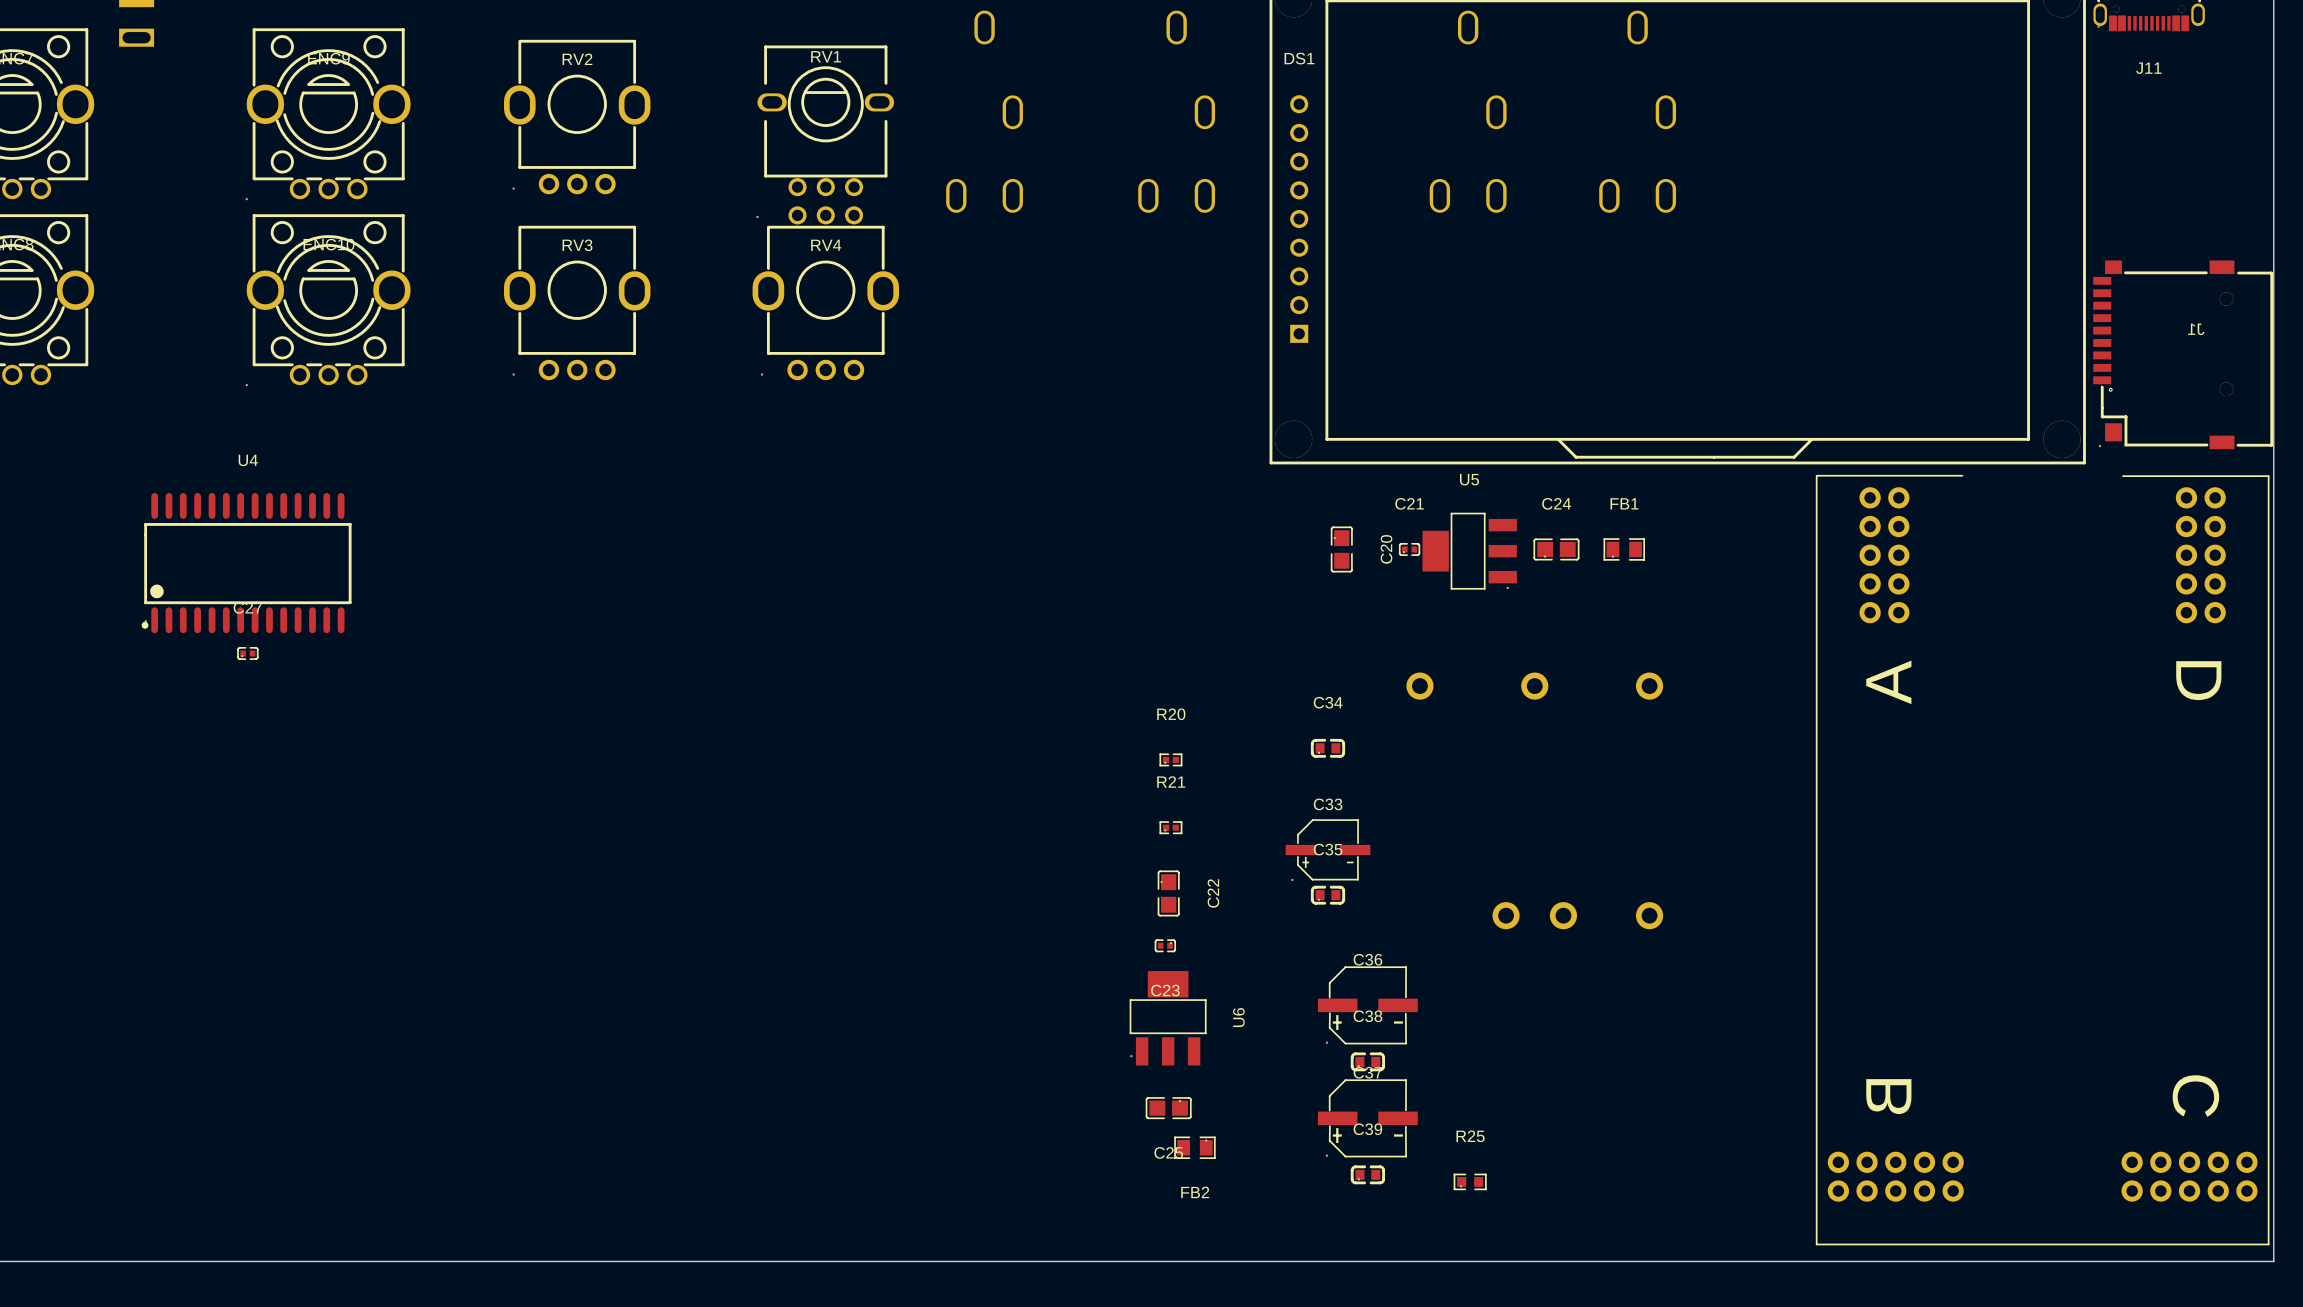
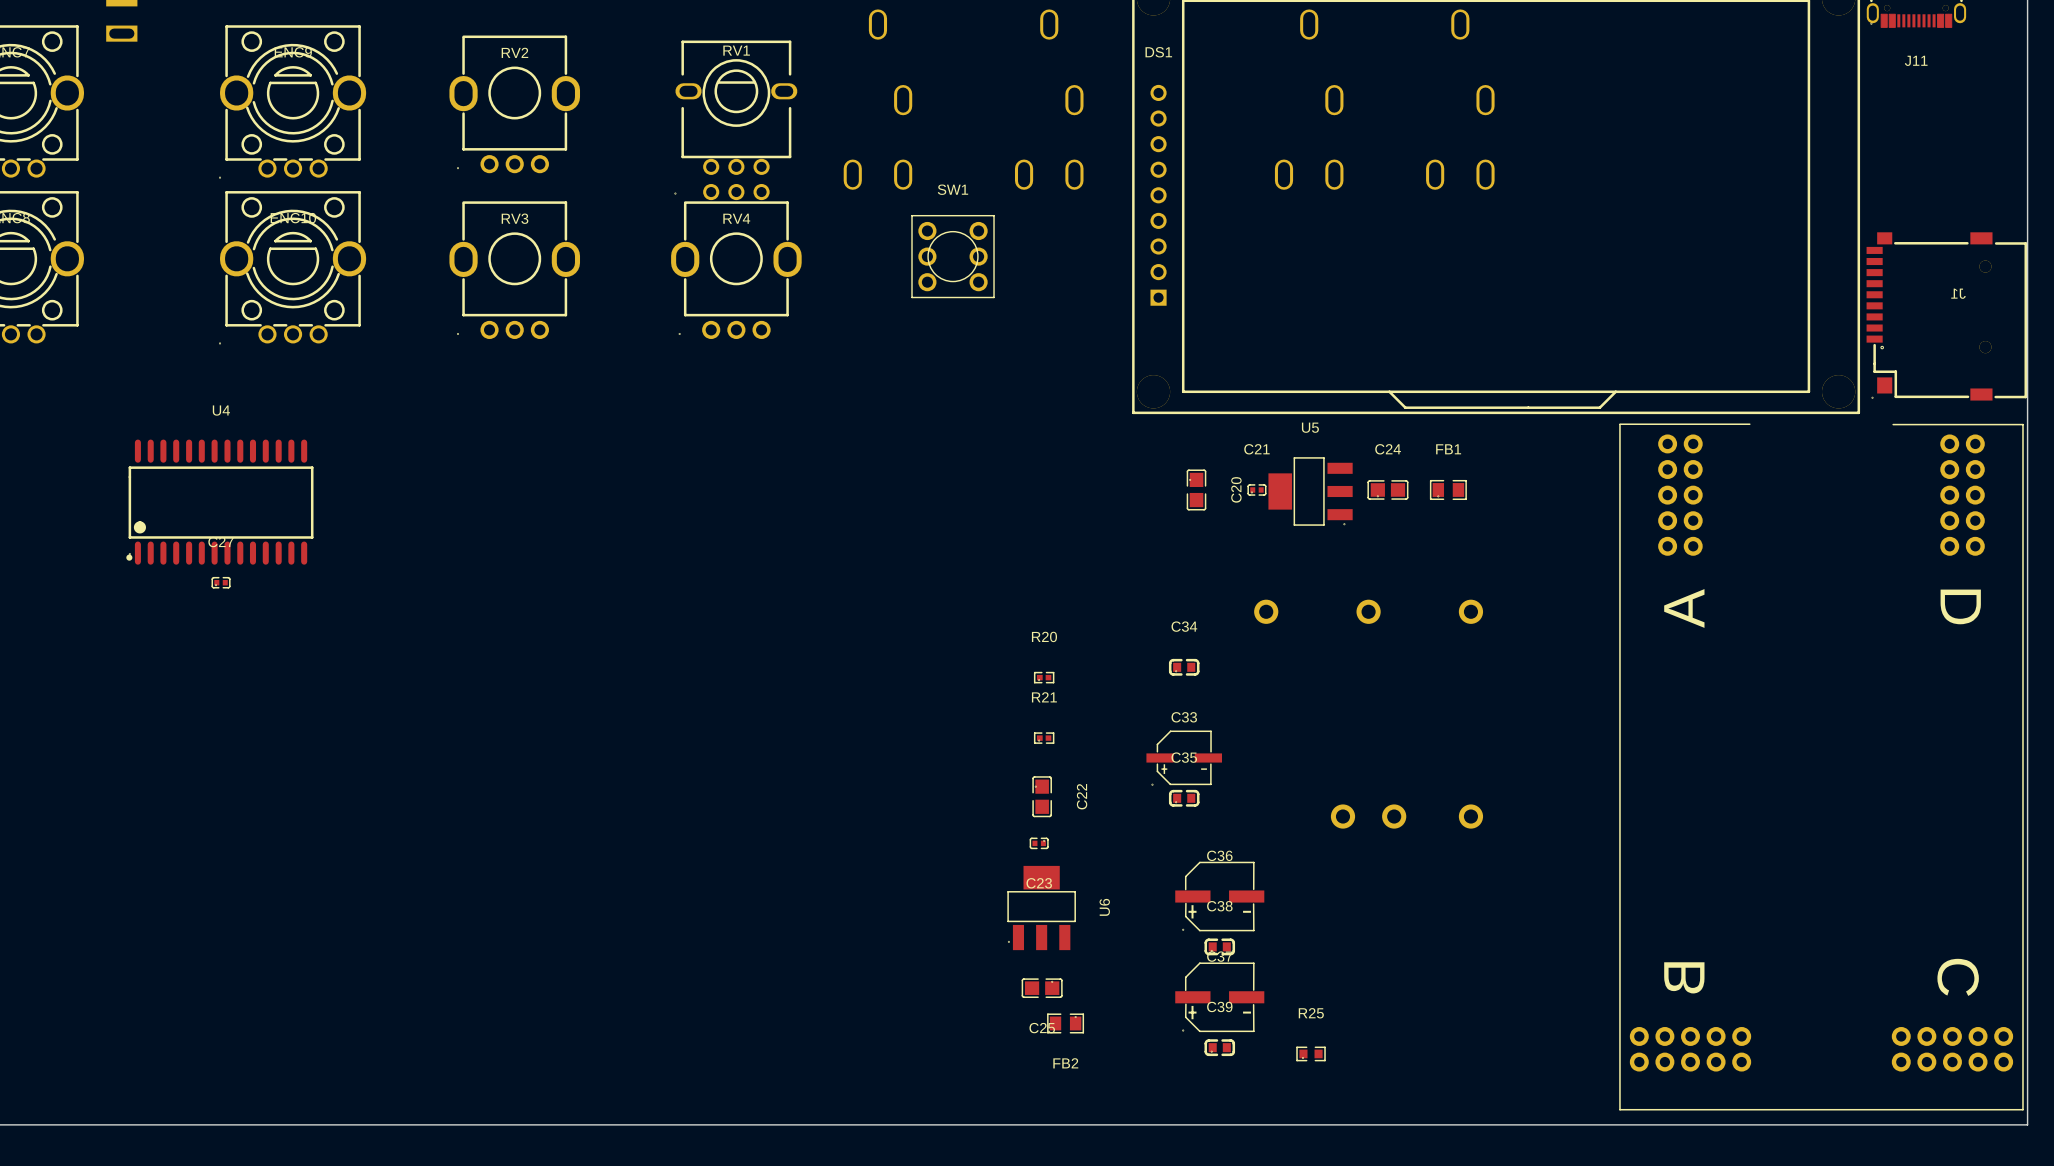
SW1: none -> (953, 256)

